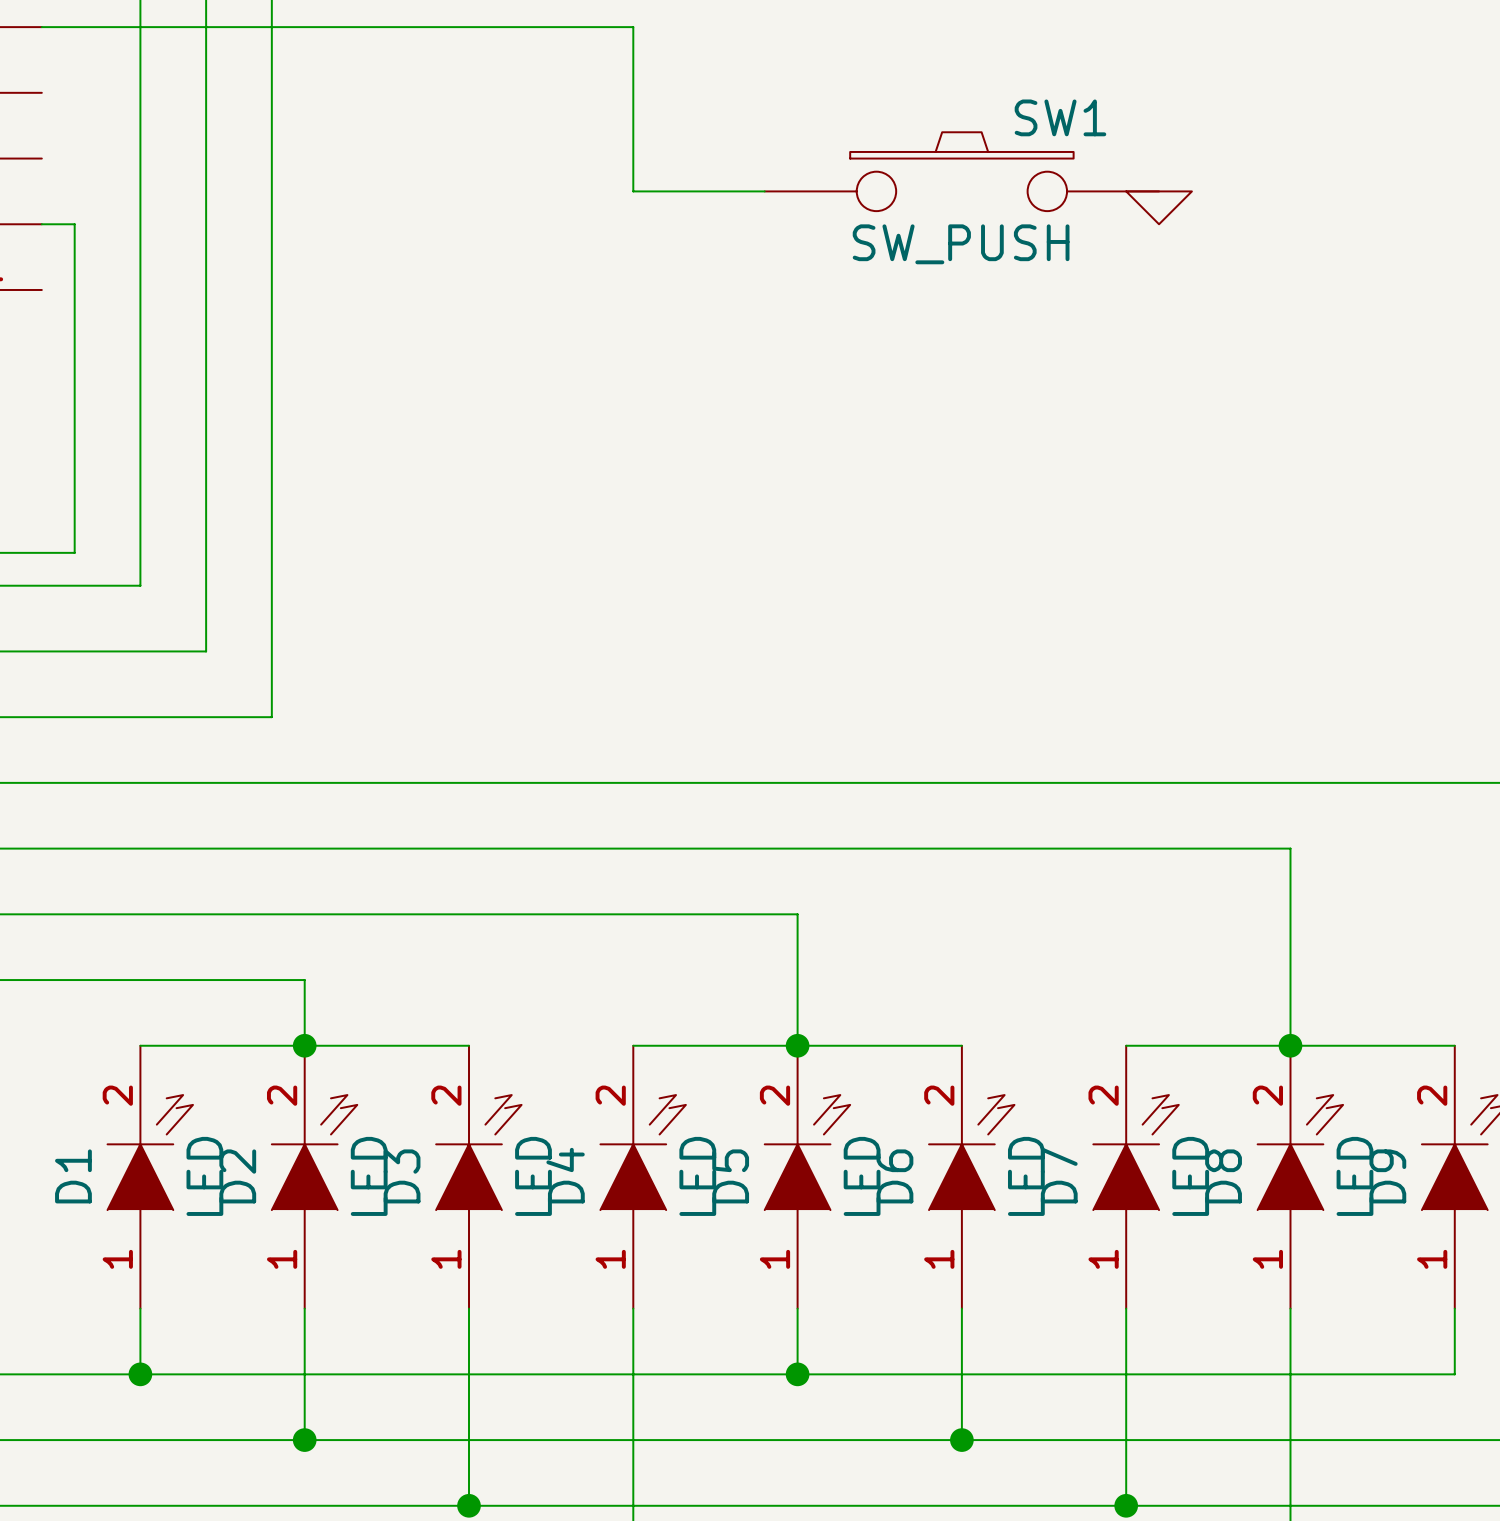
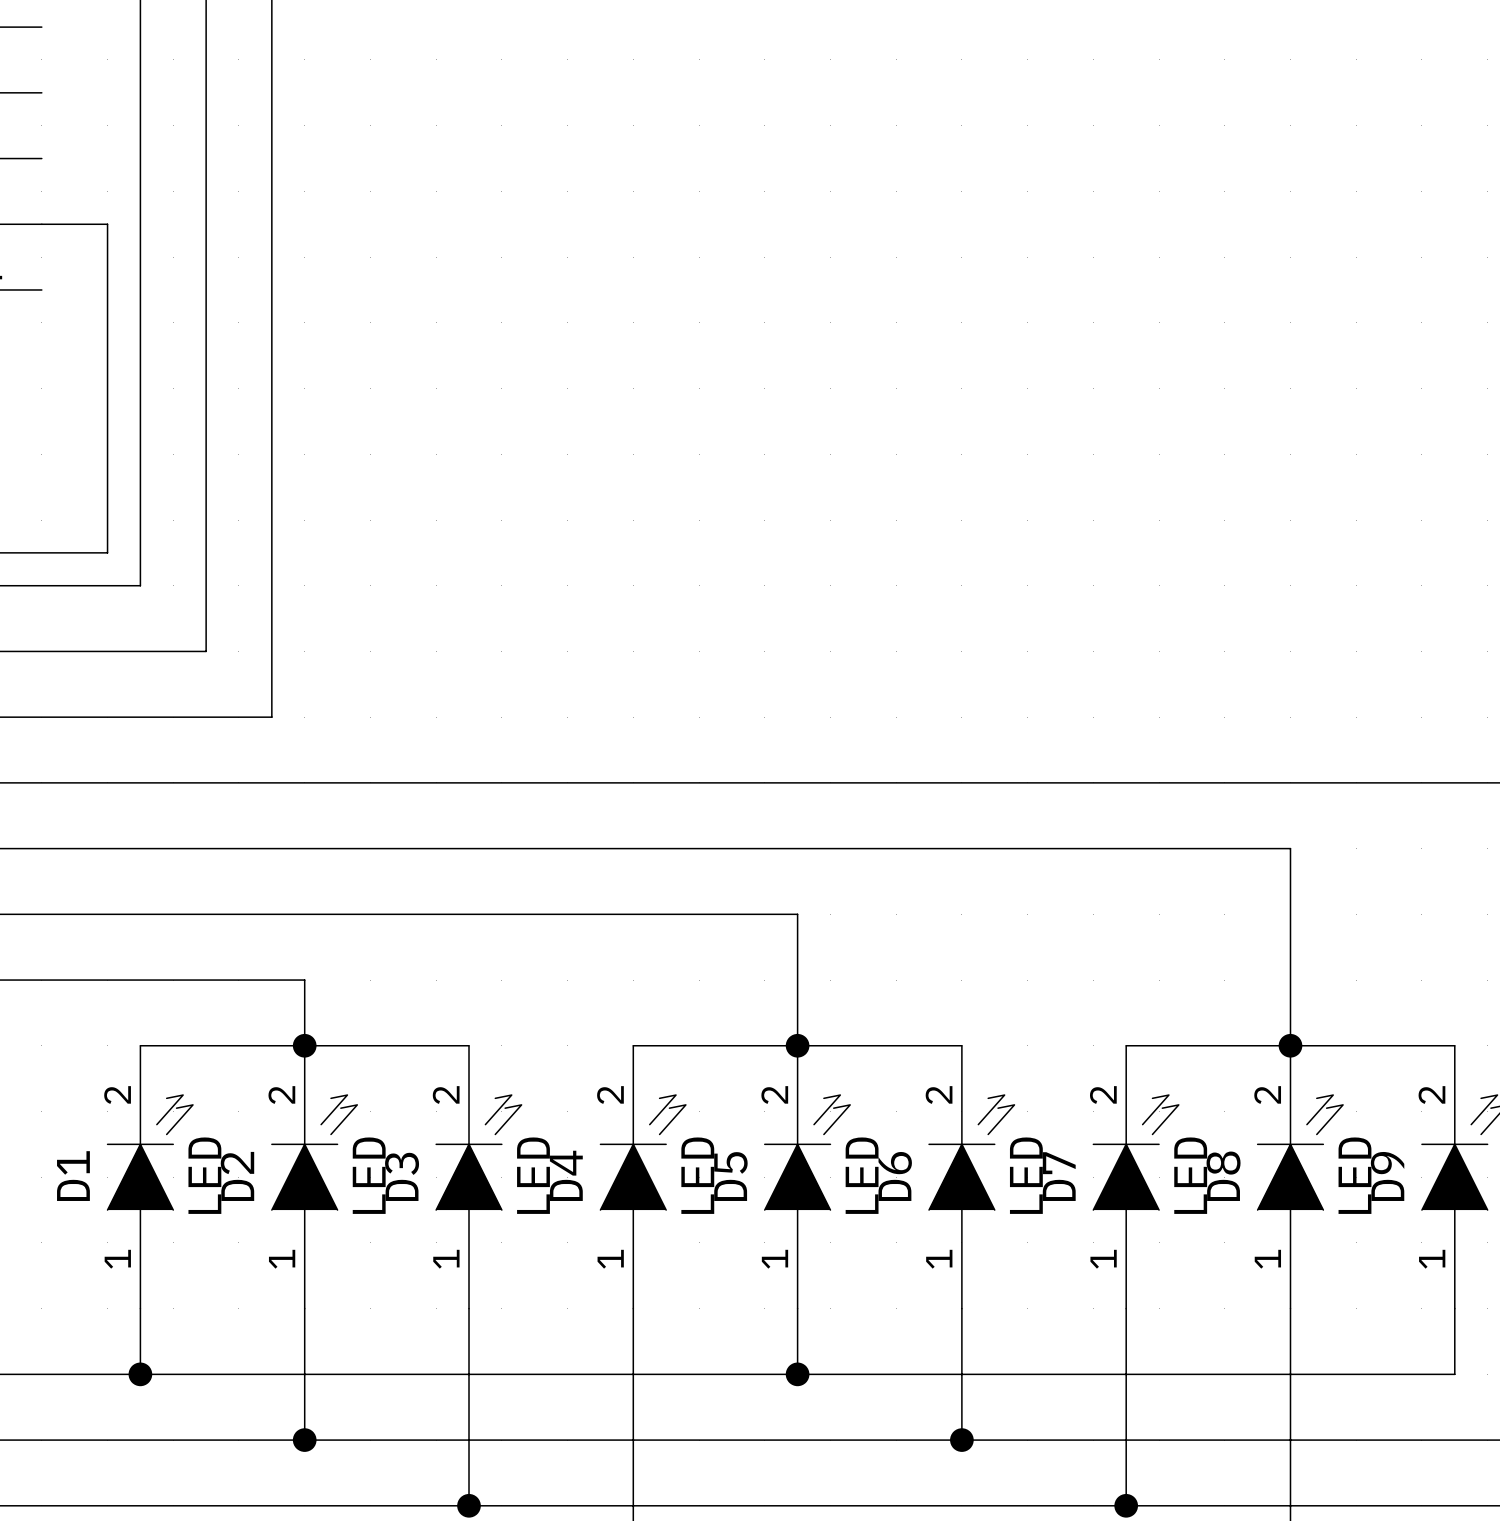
wire: (41, 27) (633, 27) (633, 191) (764, 191) -> none
SW1: SW_PUSH (961, 171) -> none
power symbol: (1159, 207) -> none
wire: (74, 224) (74, 552) -> (74, 224) (107, 224) (107, 552) (74, 552)

